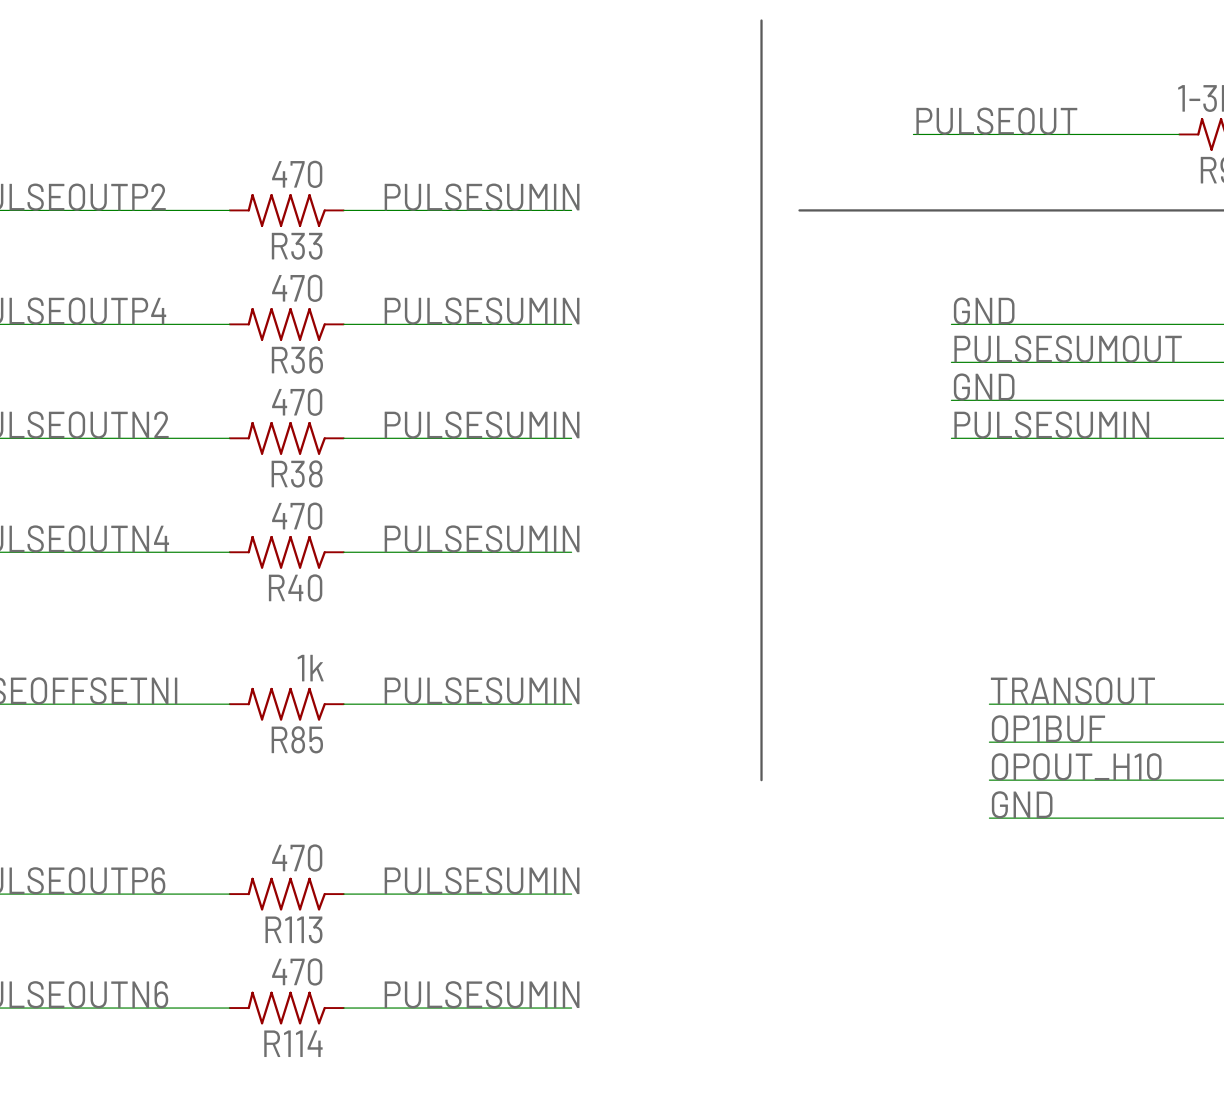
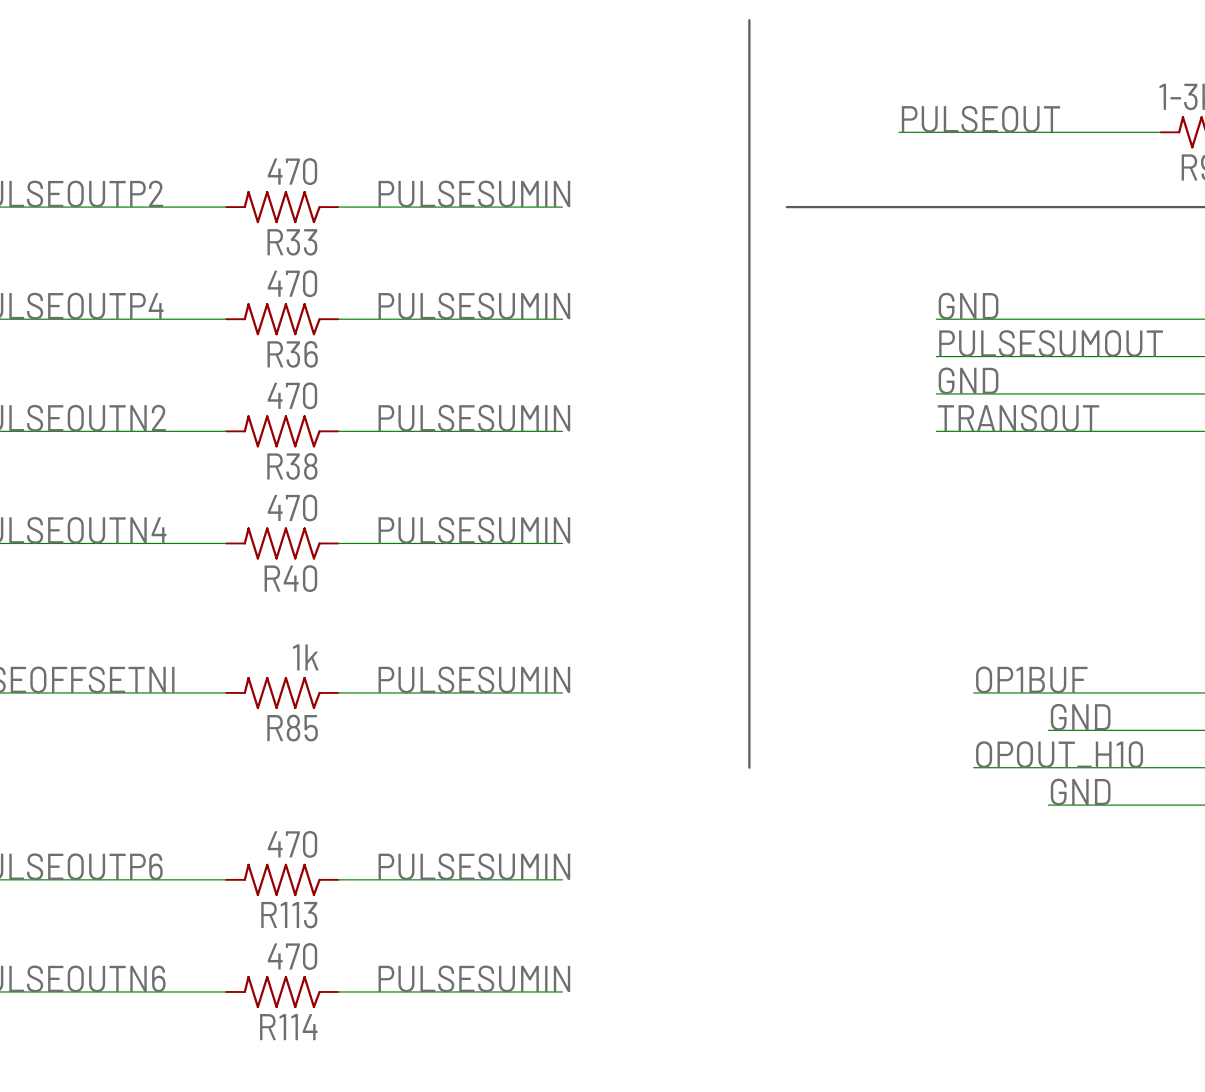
label: PULSESUMIN (1051, 425) -> TRANSOUT (1018, 418)
label: TRANSOUT (1072, 690) -> OP1BUF (1031, 679)
label: OP1BUF (1048, 728) -> none
label: none -> GND (1080, 717)
wire: (989, 742) (1065, 742) -> none
label position: GND (1022, 804) -> GND (1080, 792)
wire: (989, 818) (1065, 818) -> none

